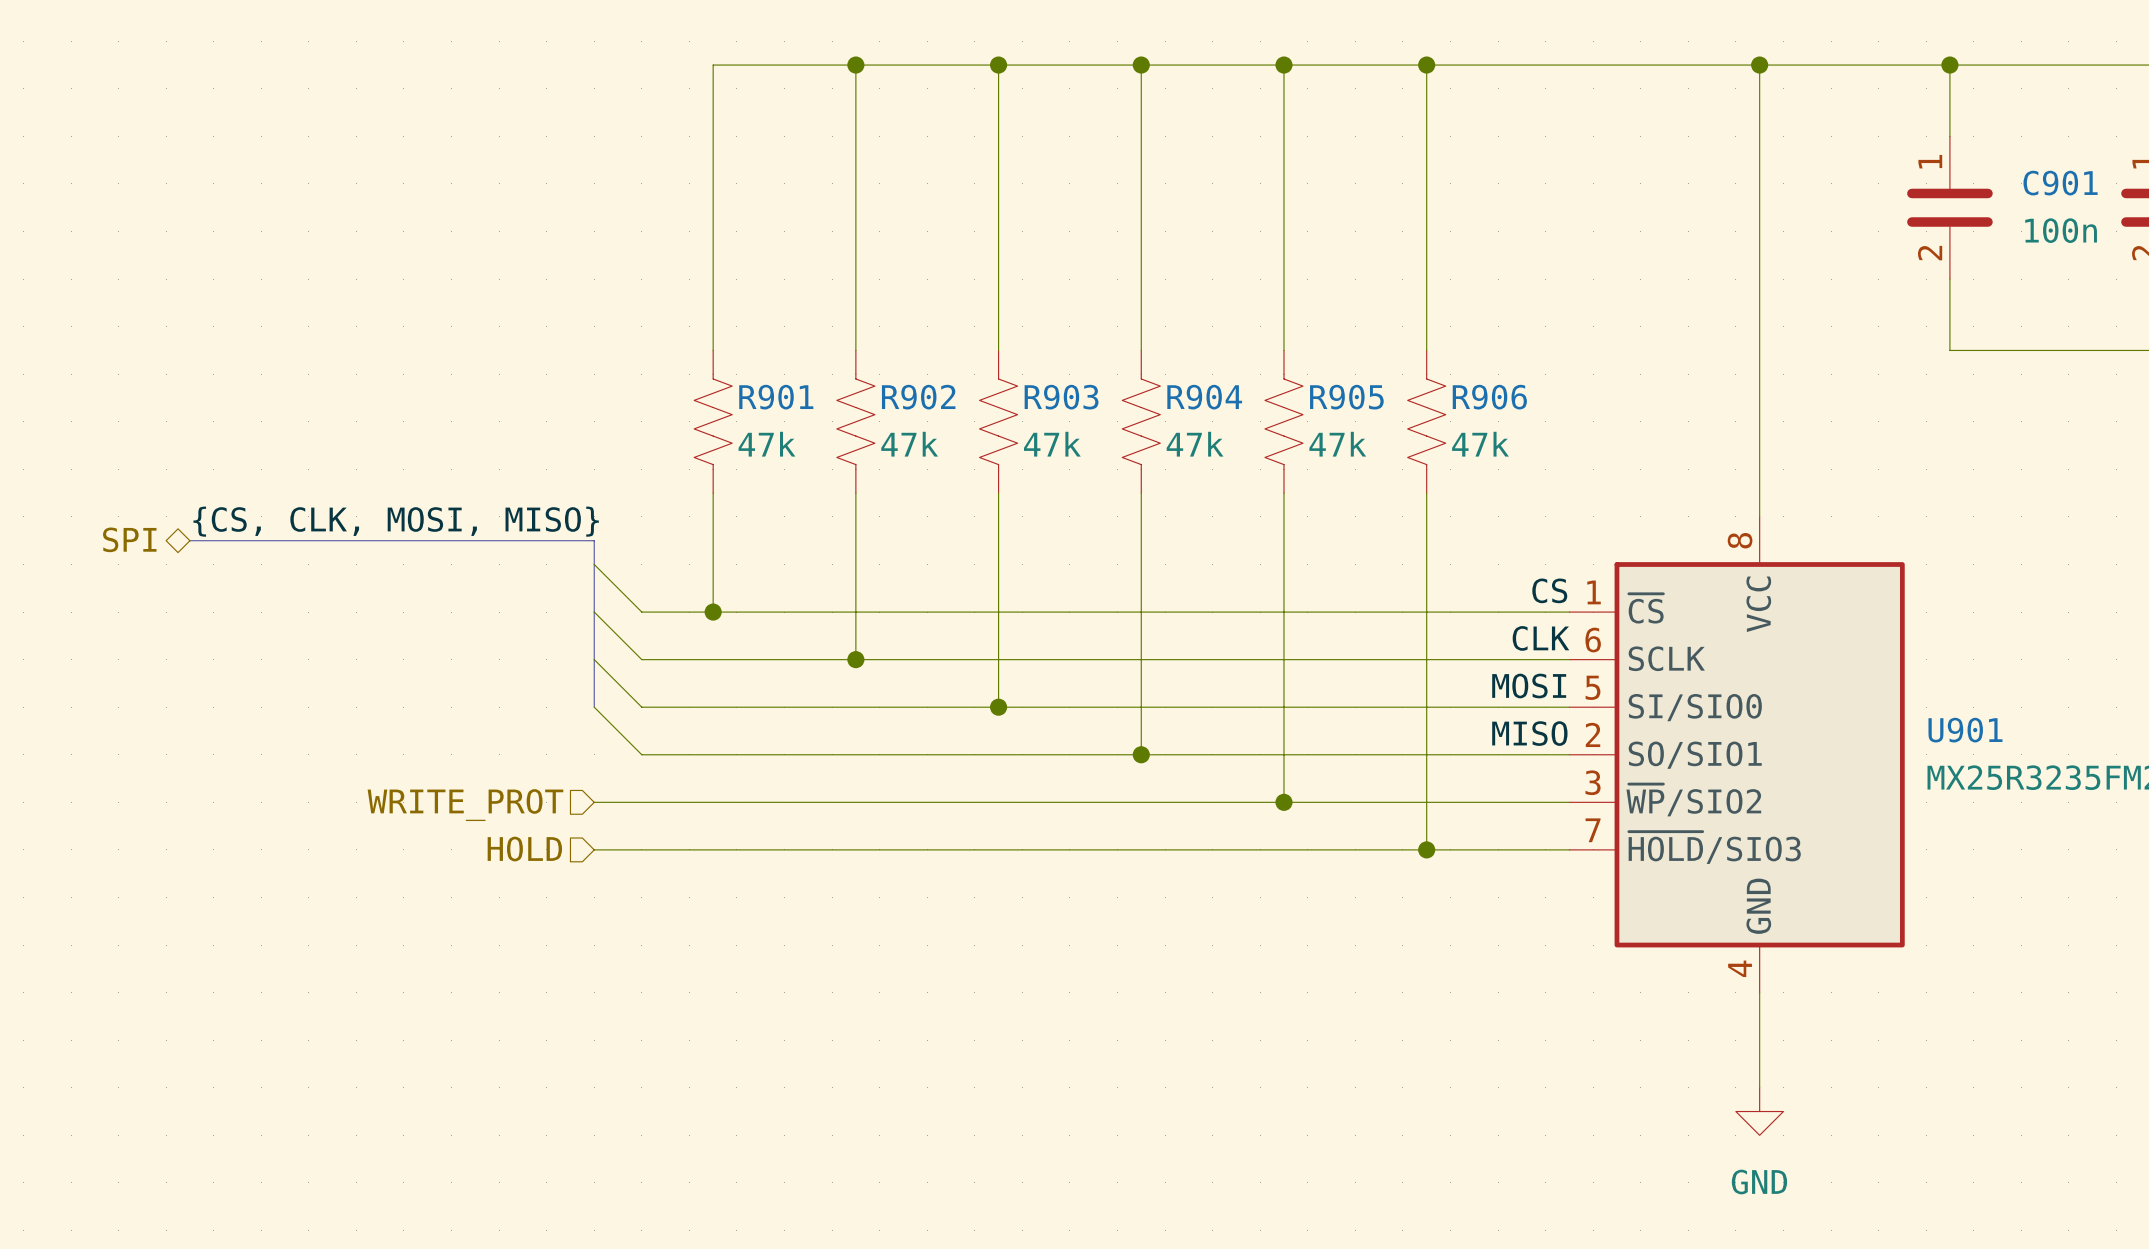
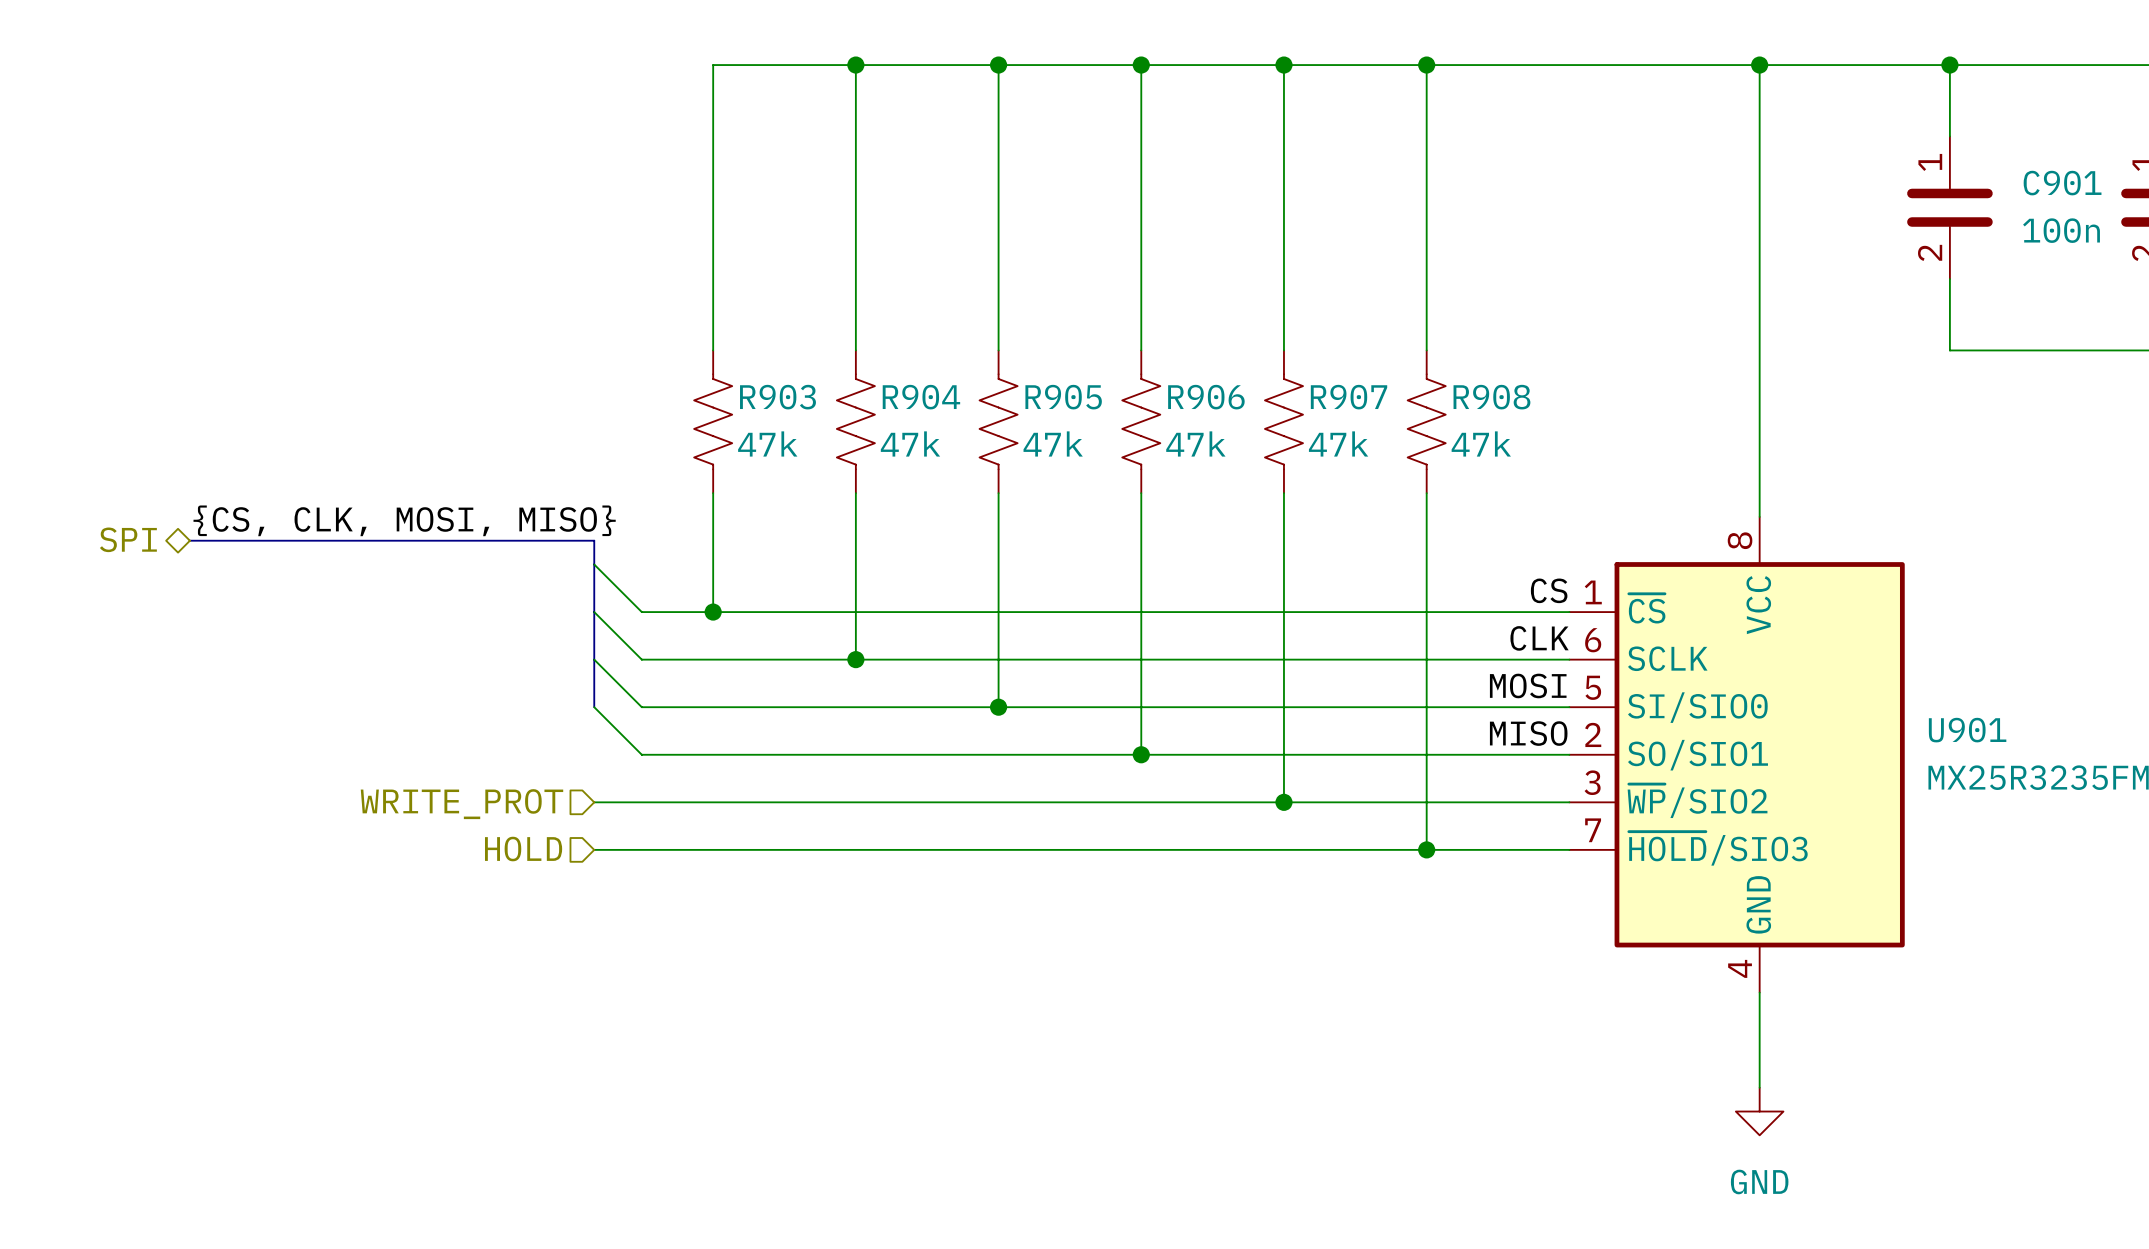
R901 name: R901 (776, 397) -> R903 (777, 397)
R902 name: R902 (918, 397) -> R904 (921, 397)
R903 name: R903 (1061, 397) -> R905 (1063, 397)
R904 name: R904 (1204, 397) -> R906 (1206, 397)
R905 name: R905 (1346, 397) -> R907 (1349, 397)
R906 name: R906 (1489, 397) -> R908 (1491, 397)

